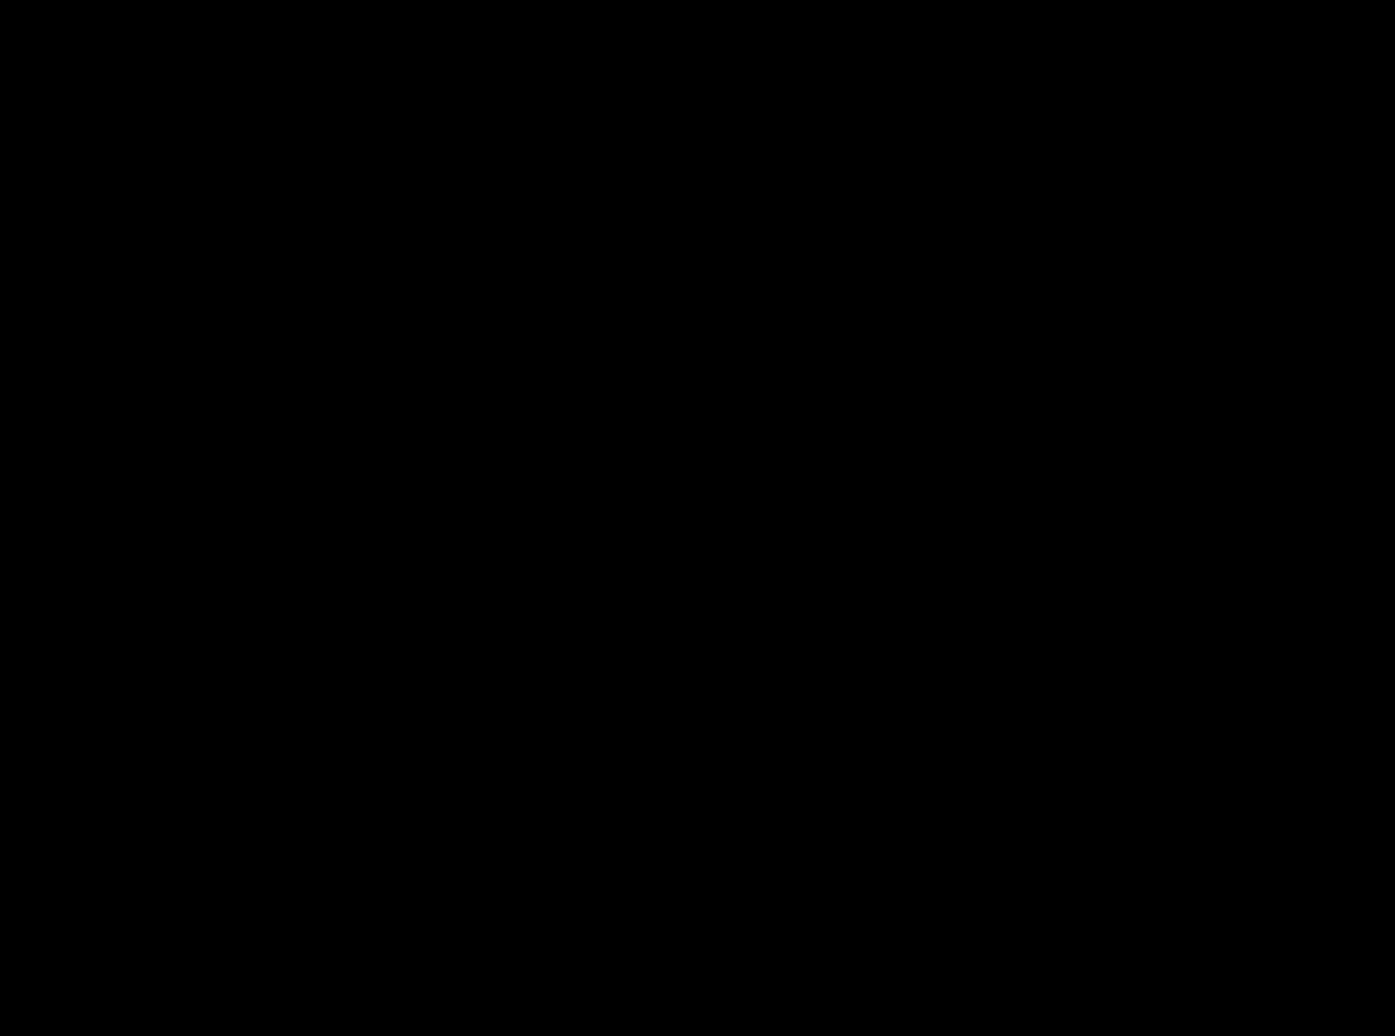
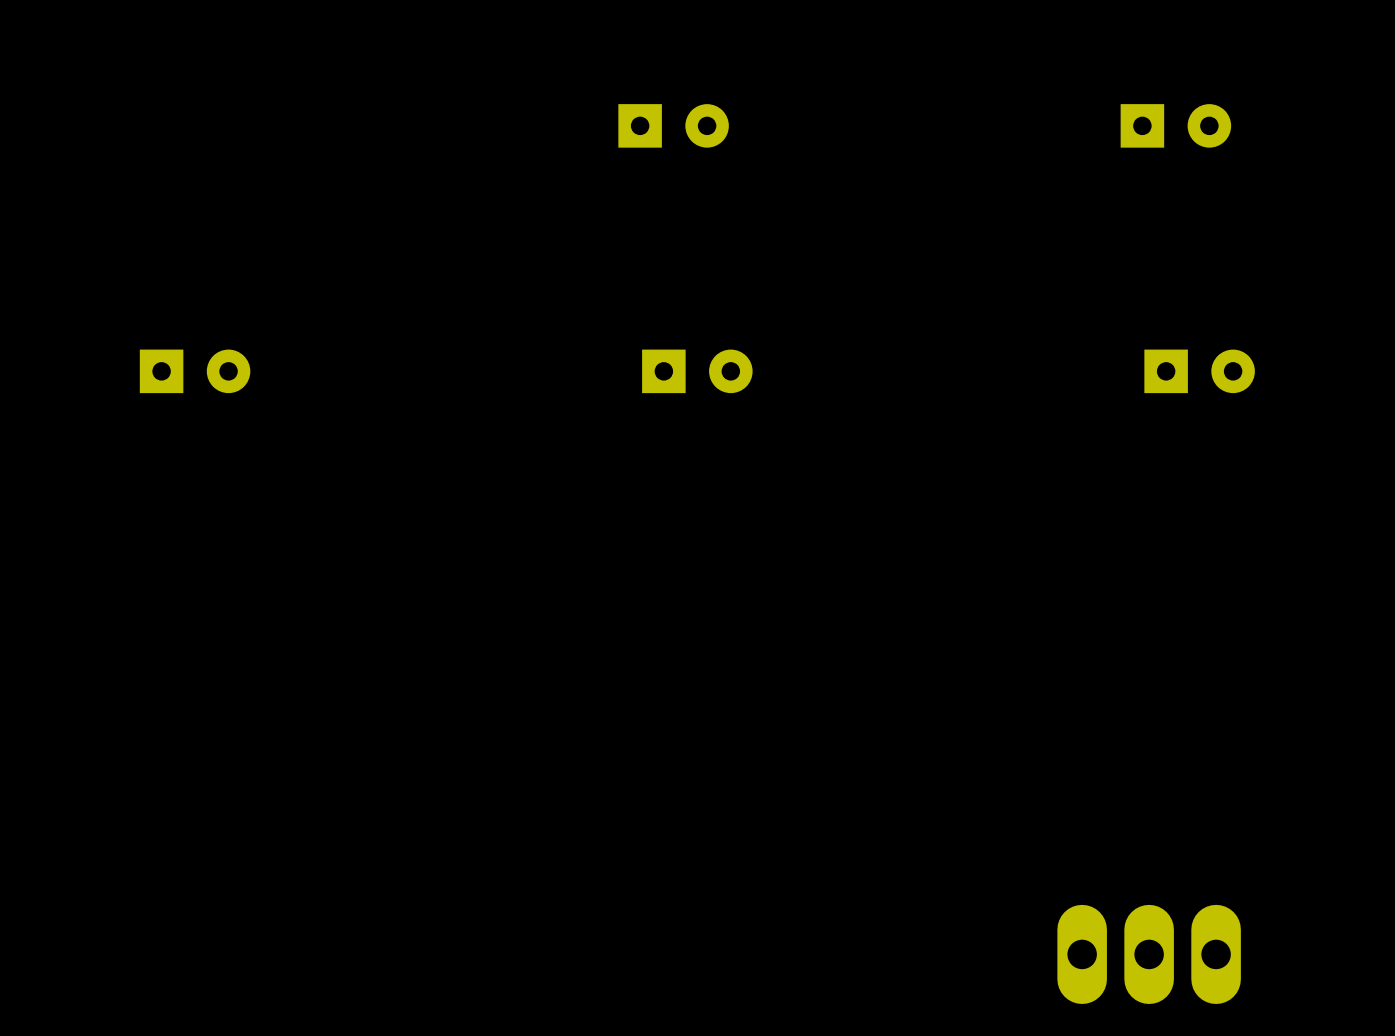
part: none -> (673, 125)
part: none -> (1175, 125)
part: none -> (195, 371)
part: none -> (697, 371)
part: none -> (1199, 371)
part: none -> (1149, 954)

